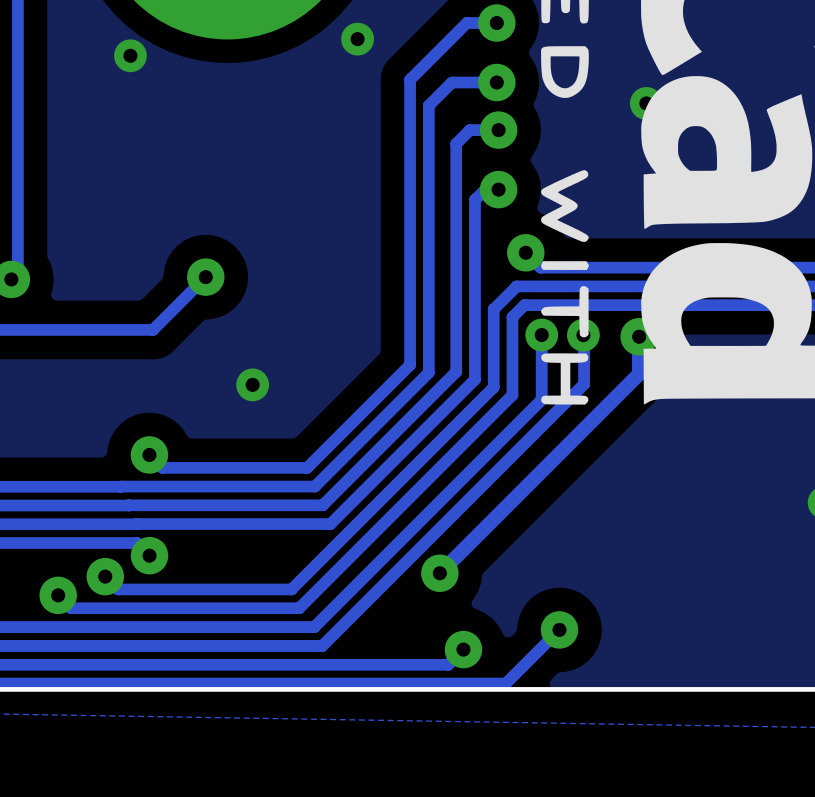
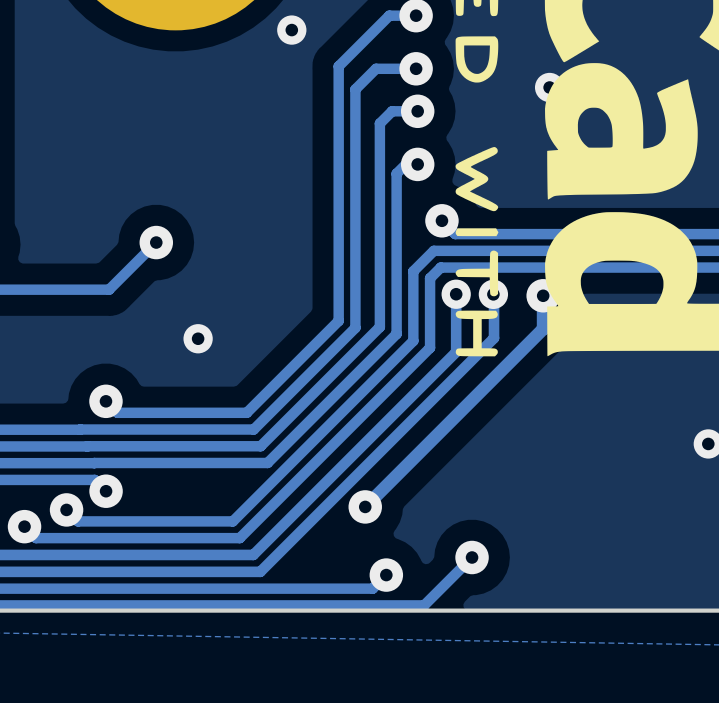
via: (130, 55) -> none

